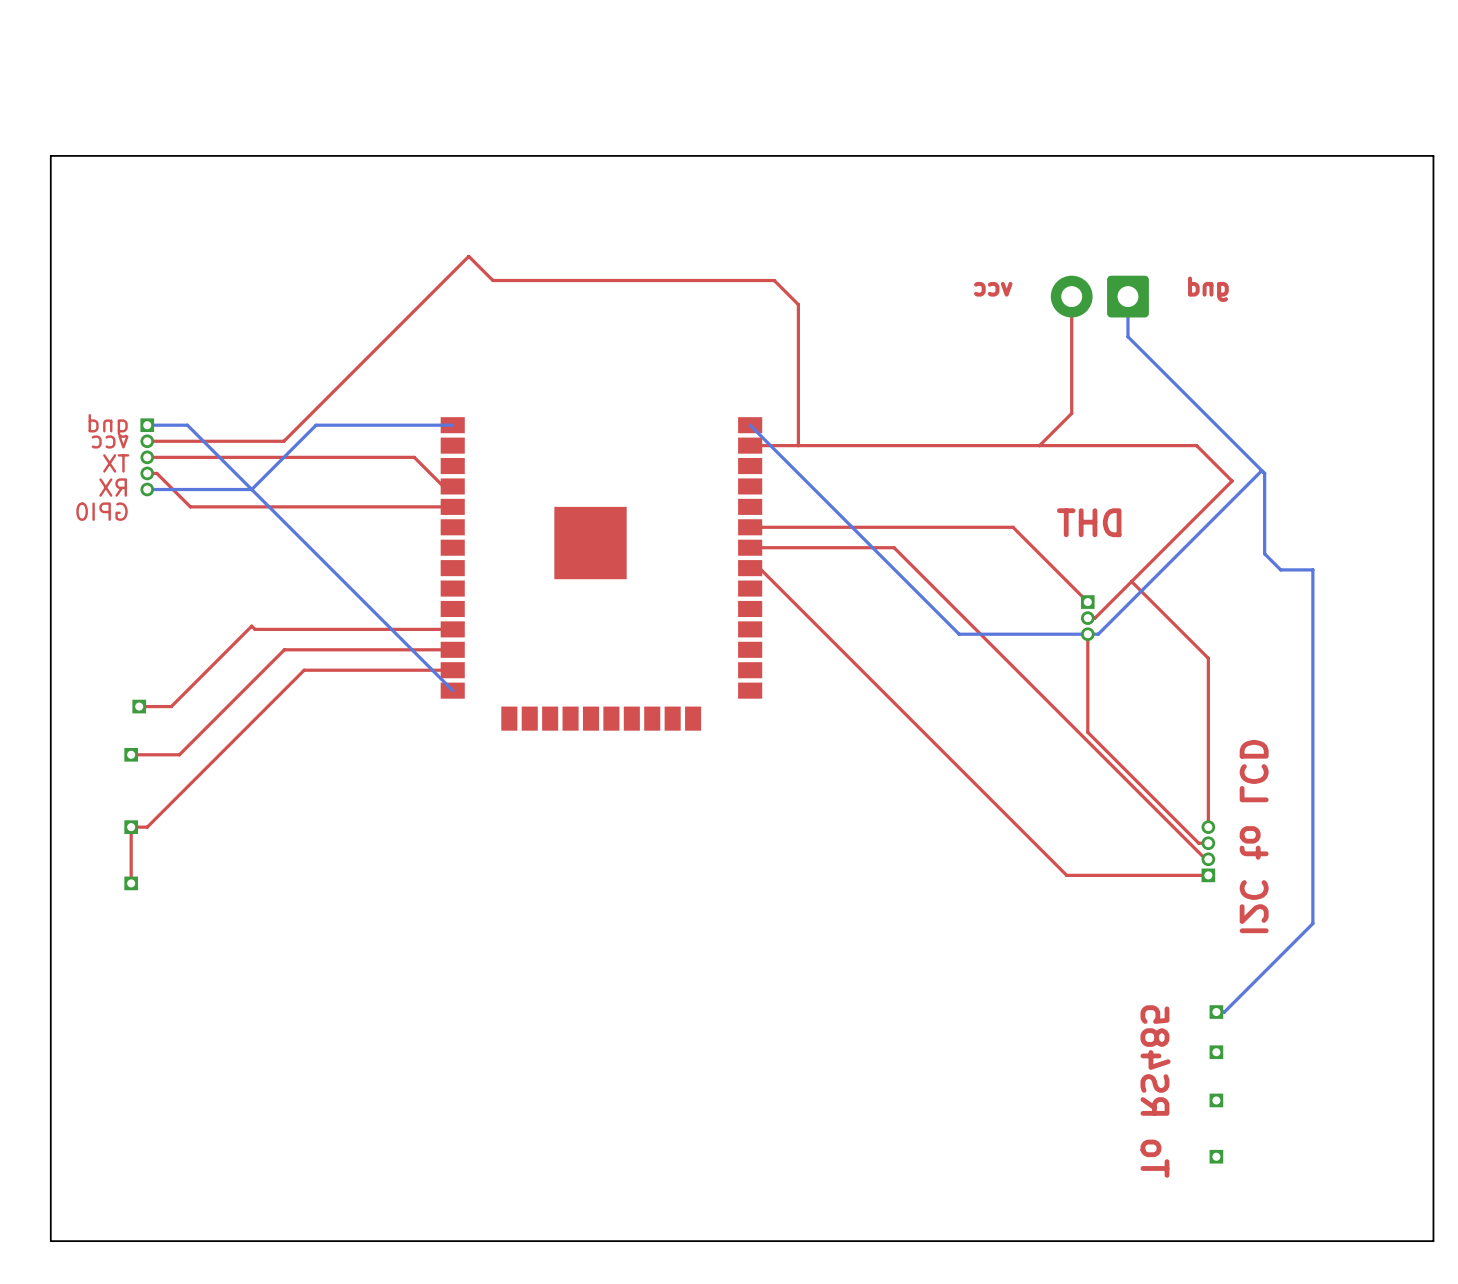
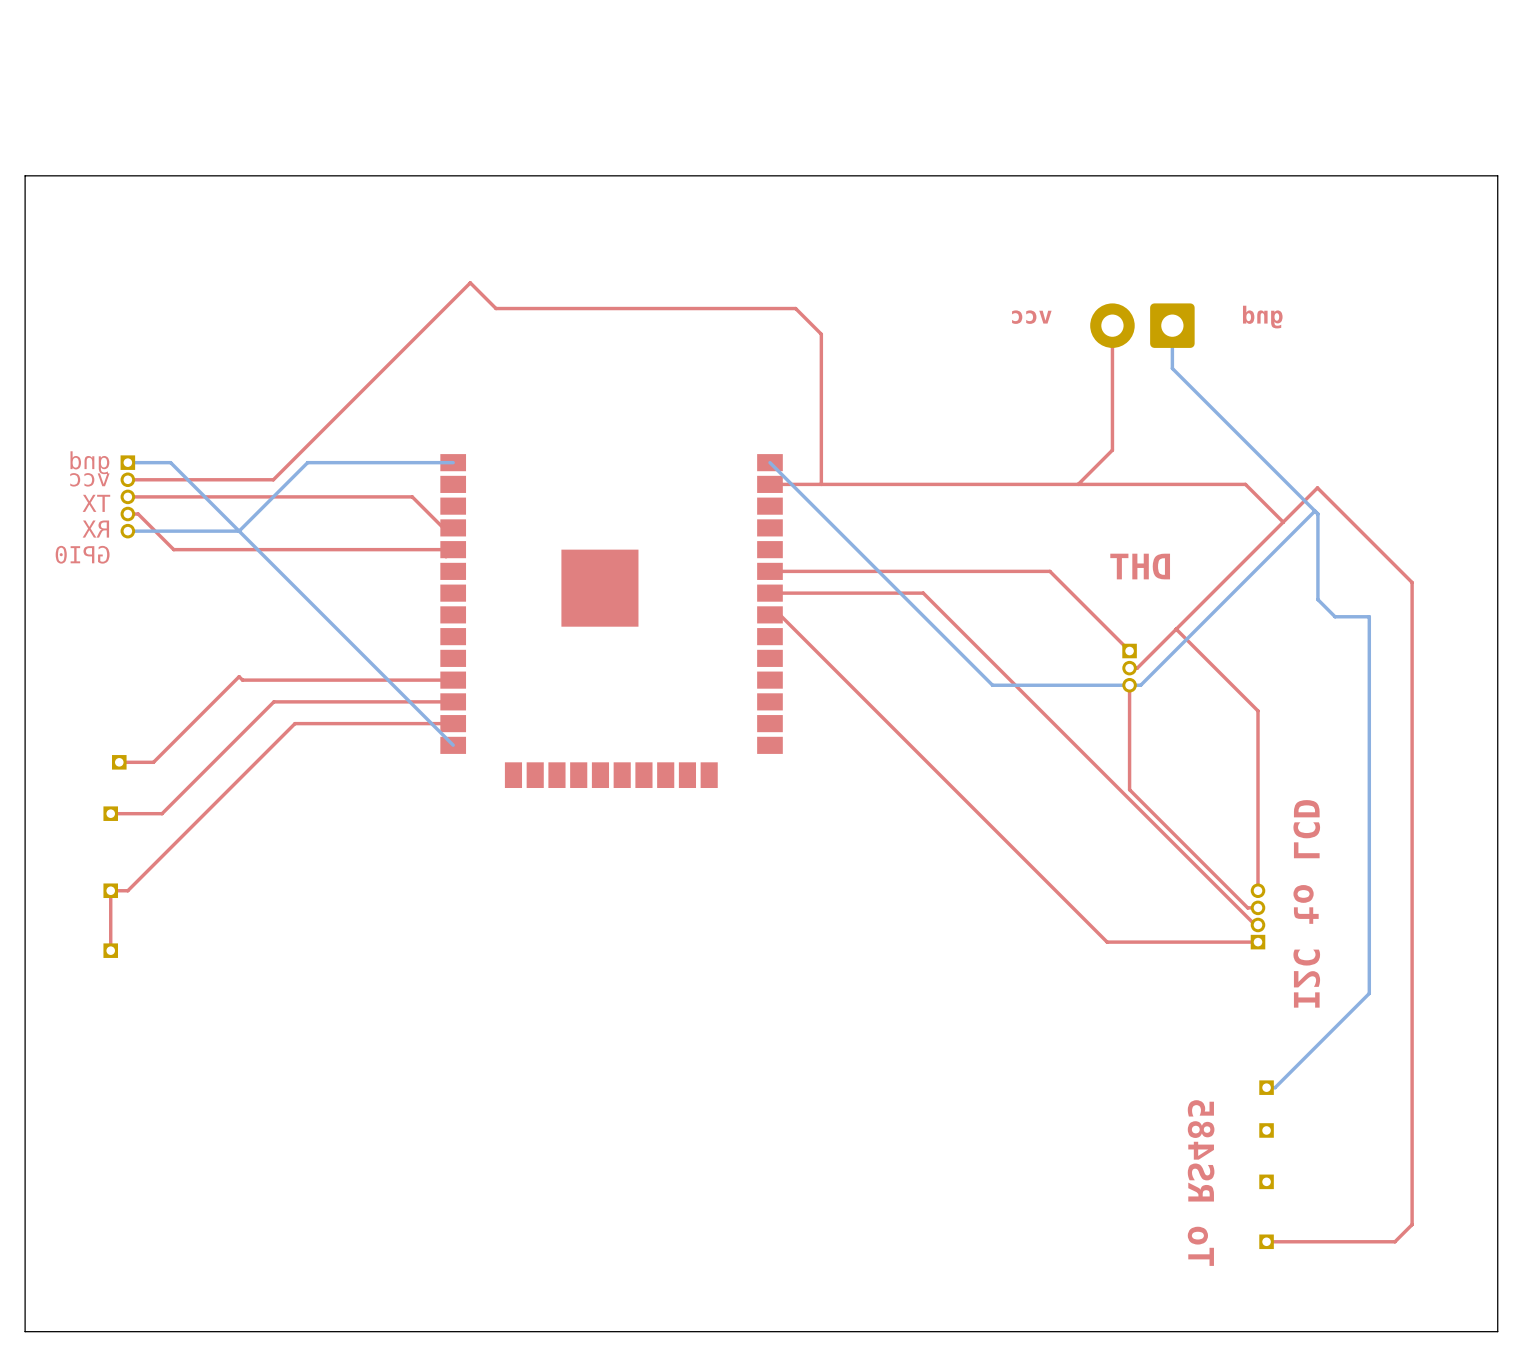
top track: none -> (1283, 522) (1317, 487) (1412, 582) (1412, 1224) (1394, 1241) (1266, 1241)

